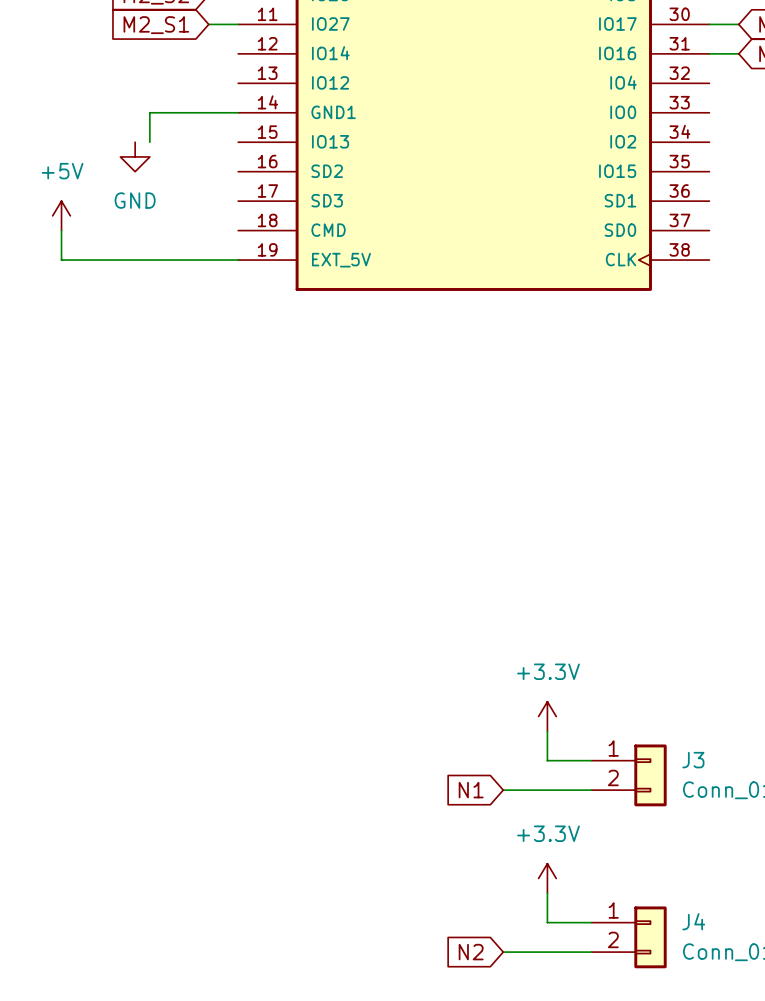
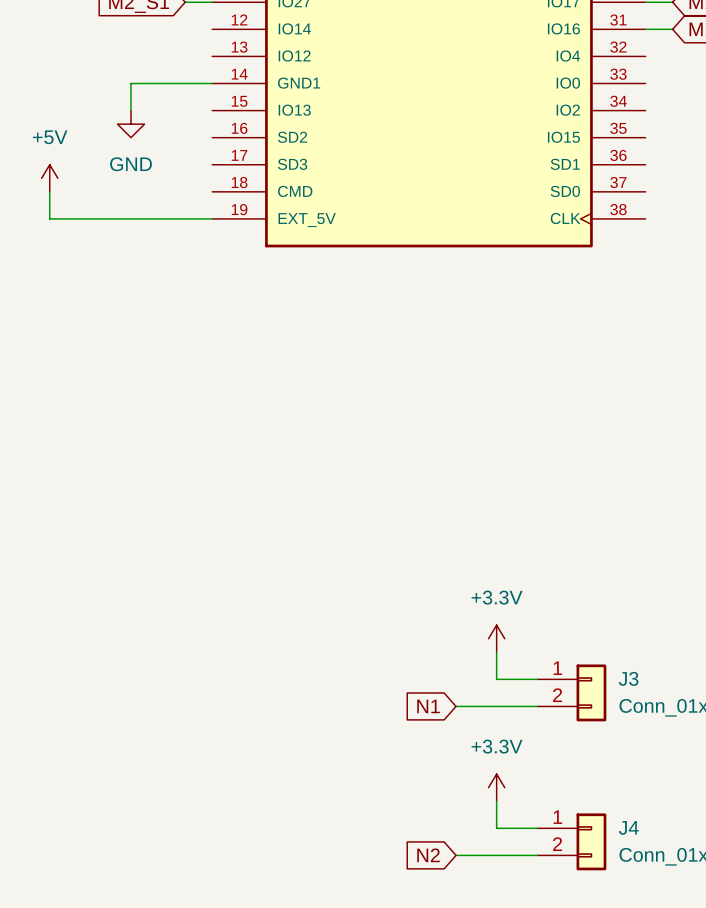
power symbol position: GND (135, 156) -> GND (131, 124)

